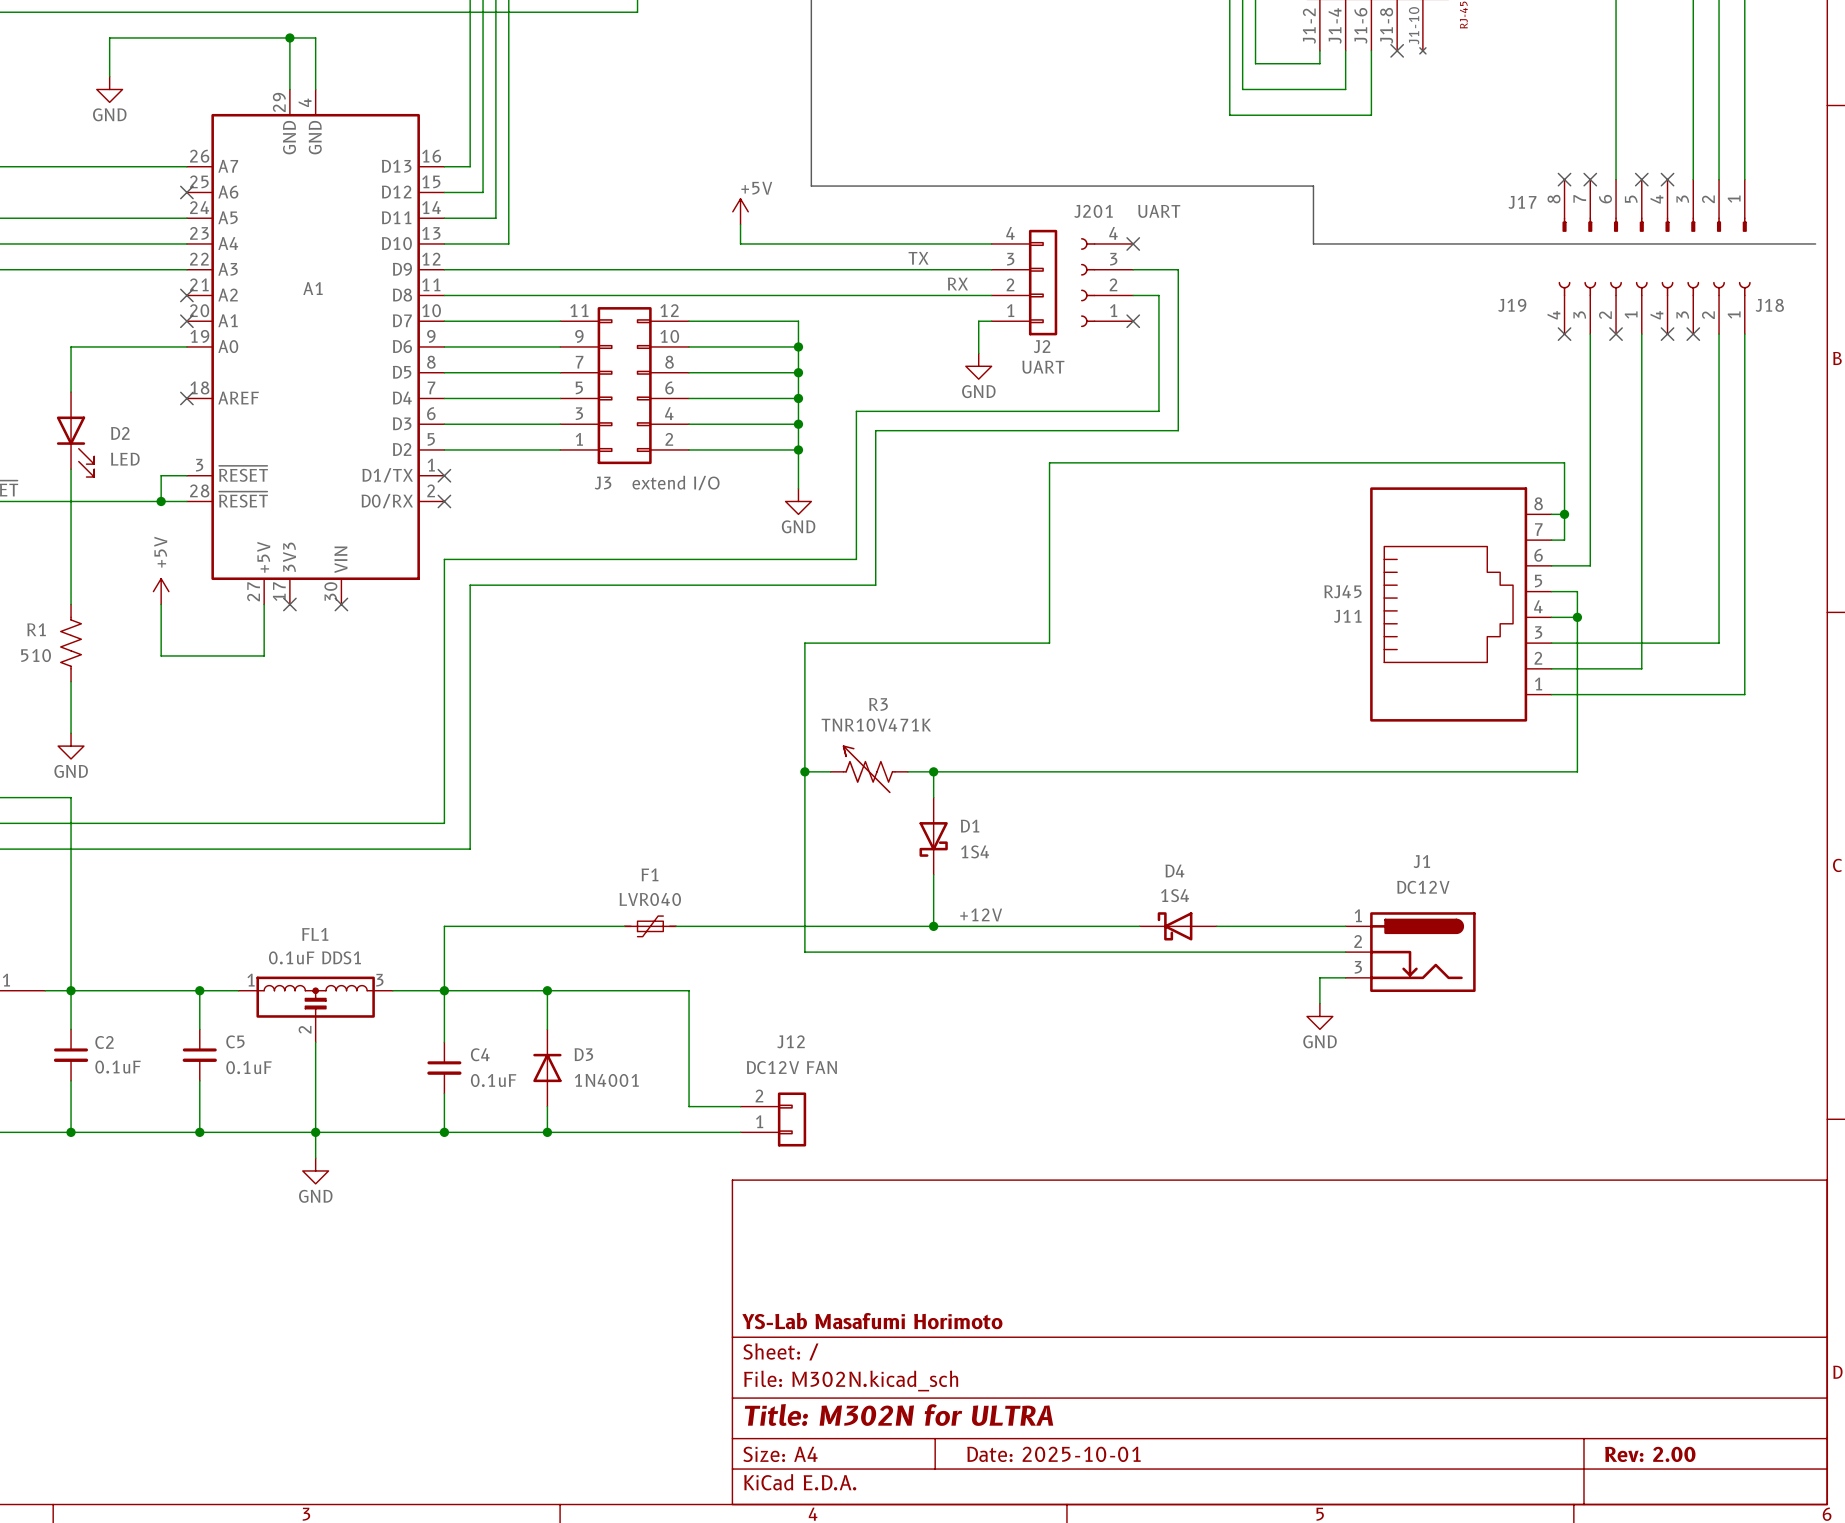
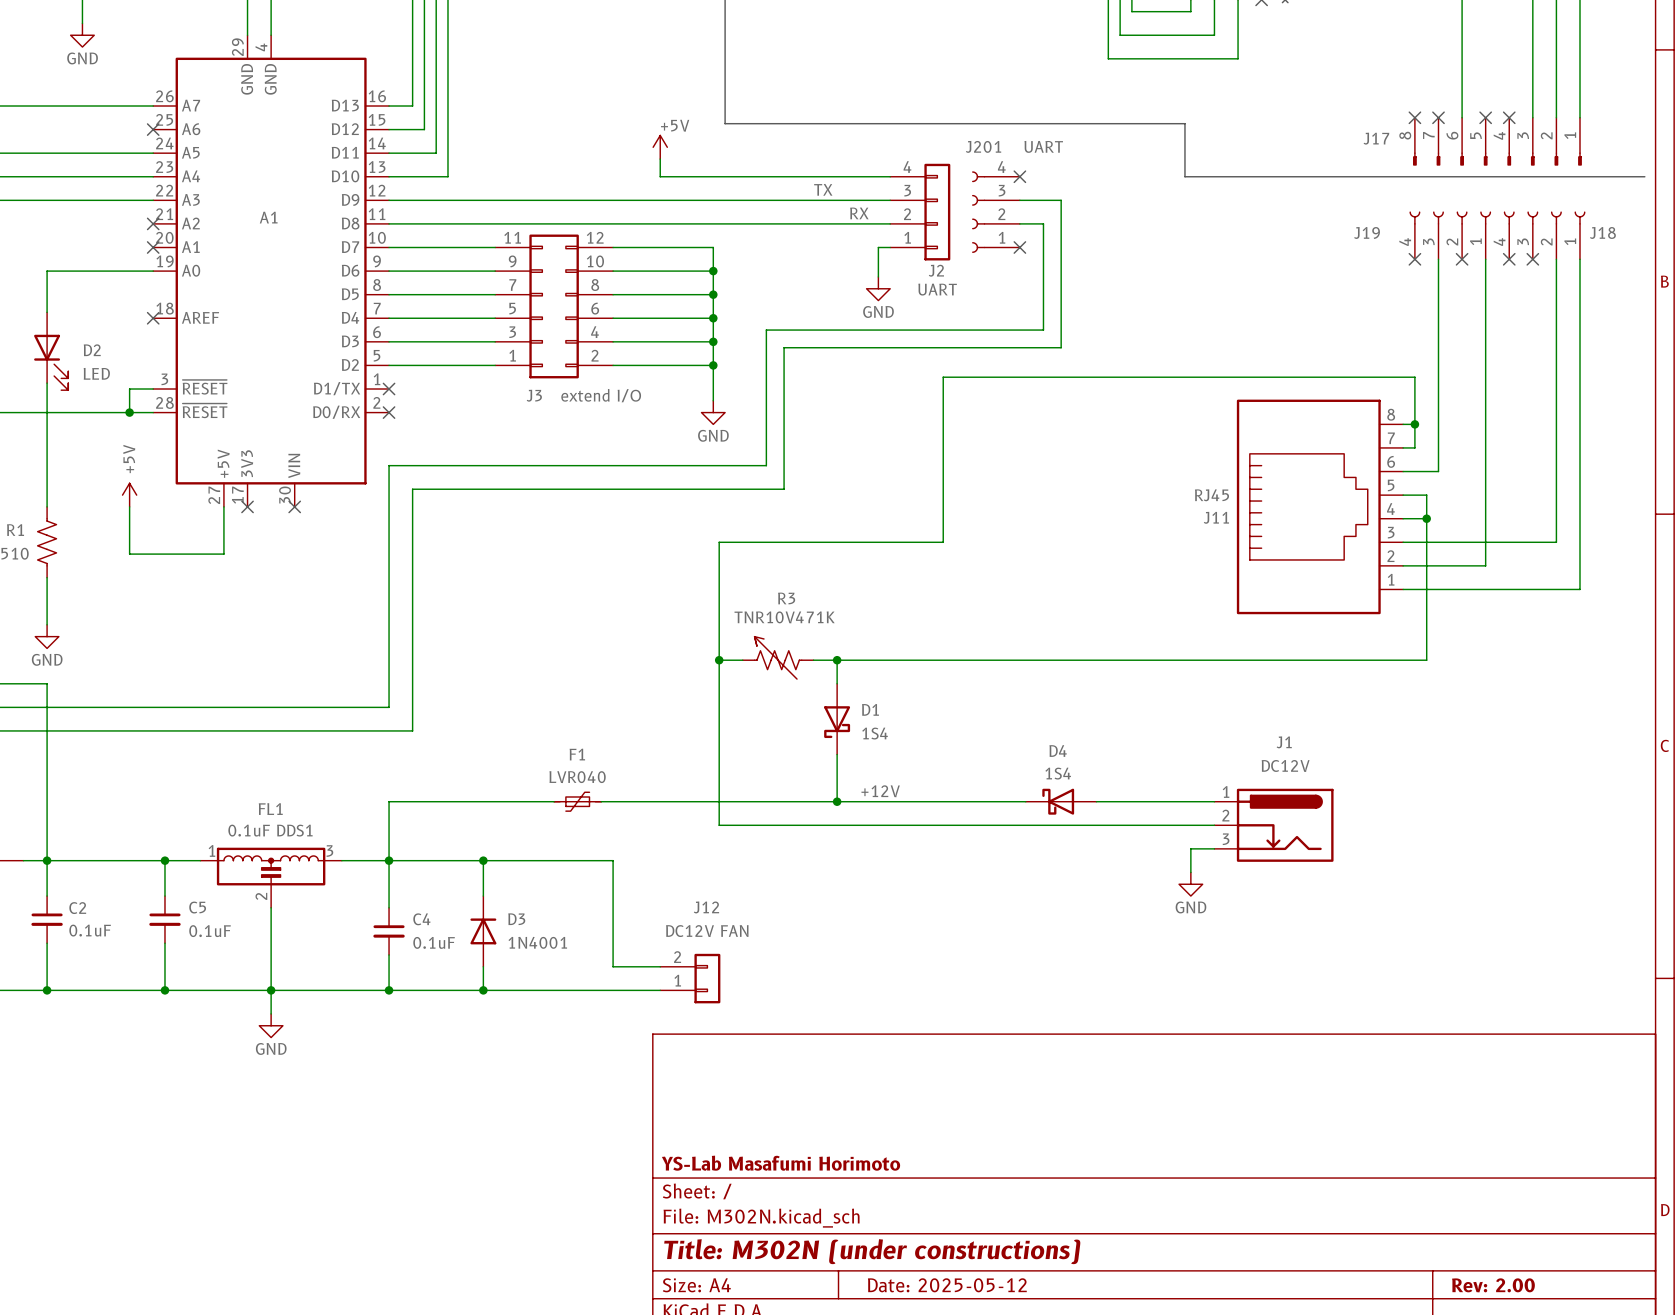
title block: Title: M302N for ULTRA (899, 1414) -> Title: M302N (under constructions) (872, 1251)
title block: Date: 2025-10-01 (1053, 1454) -> Date: 2025-05-12 (947, 1285)

